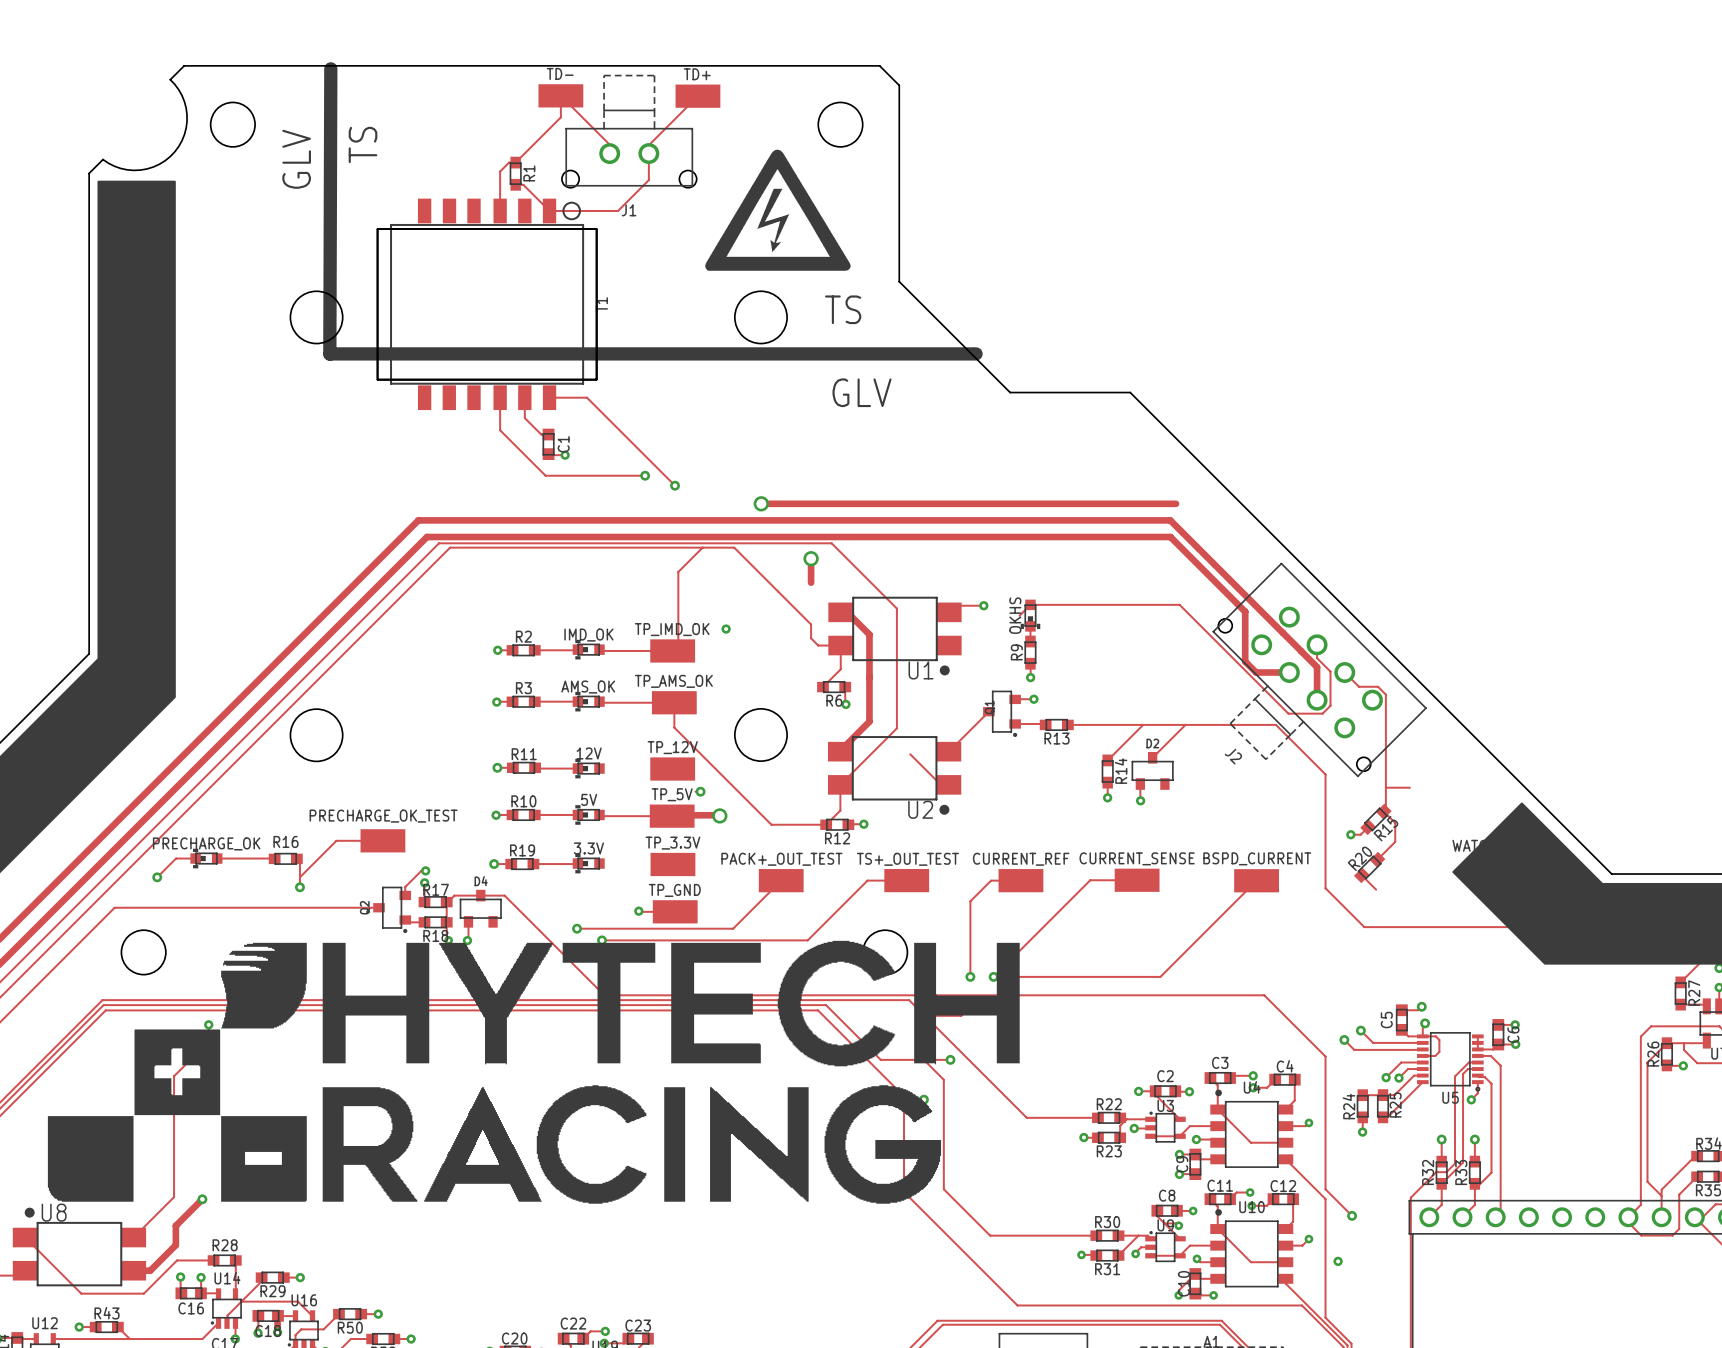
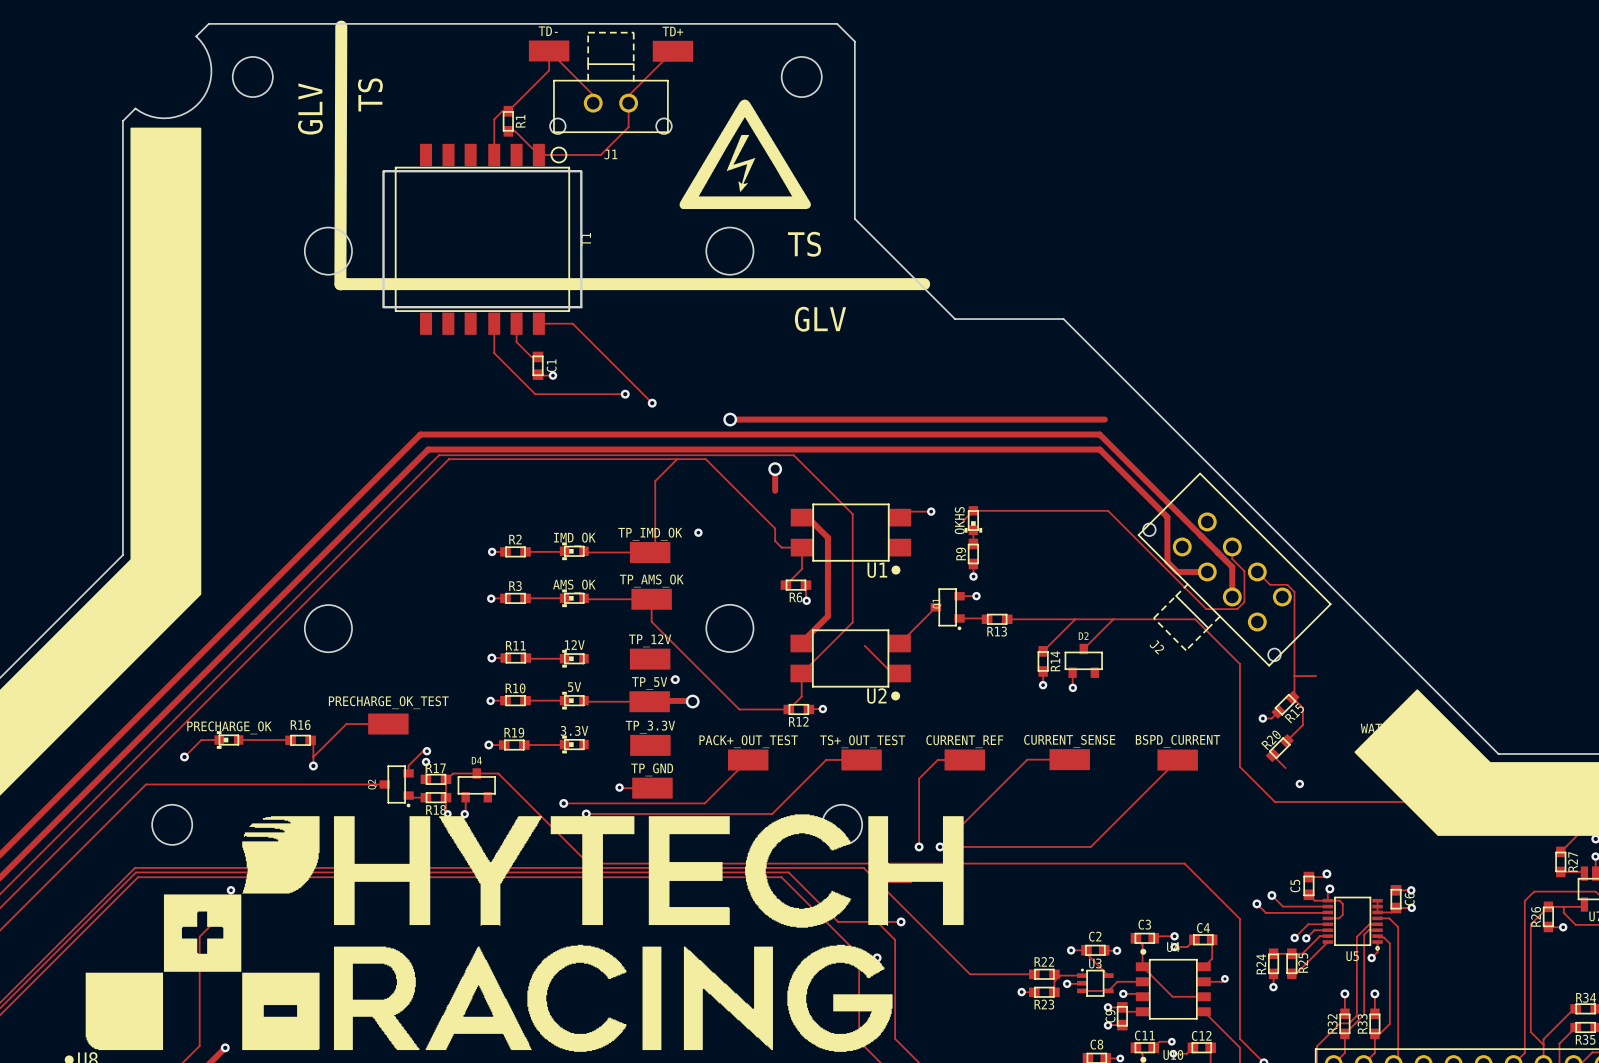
via: none -> (1299, 783)

